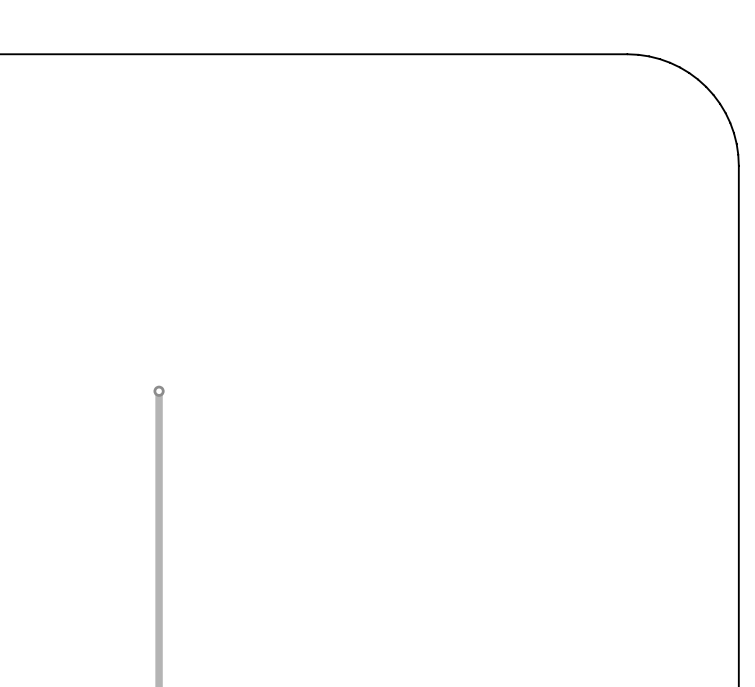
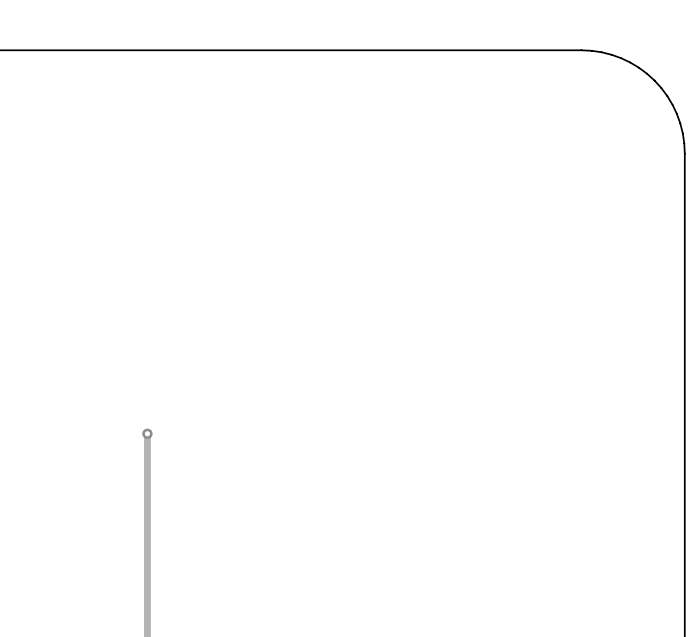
track: (159, 391) (159, 468) -> none
via position: (159, 391) -> (147, 433)

